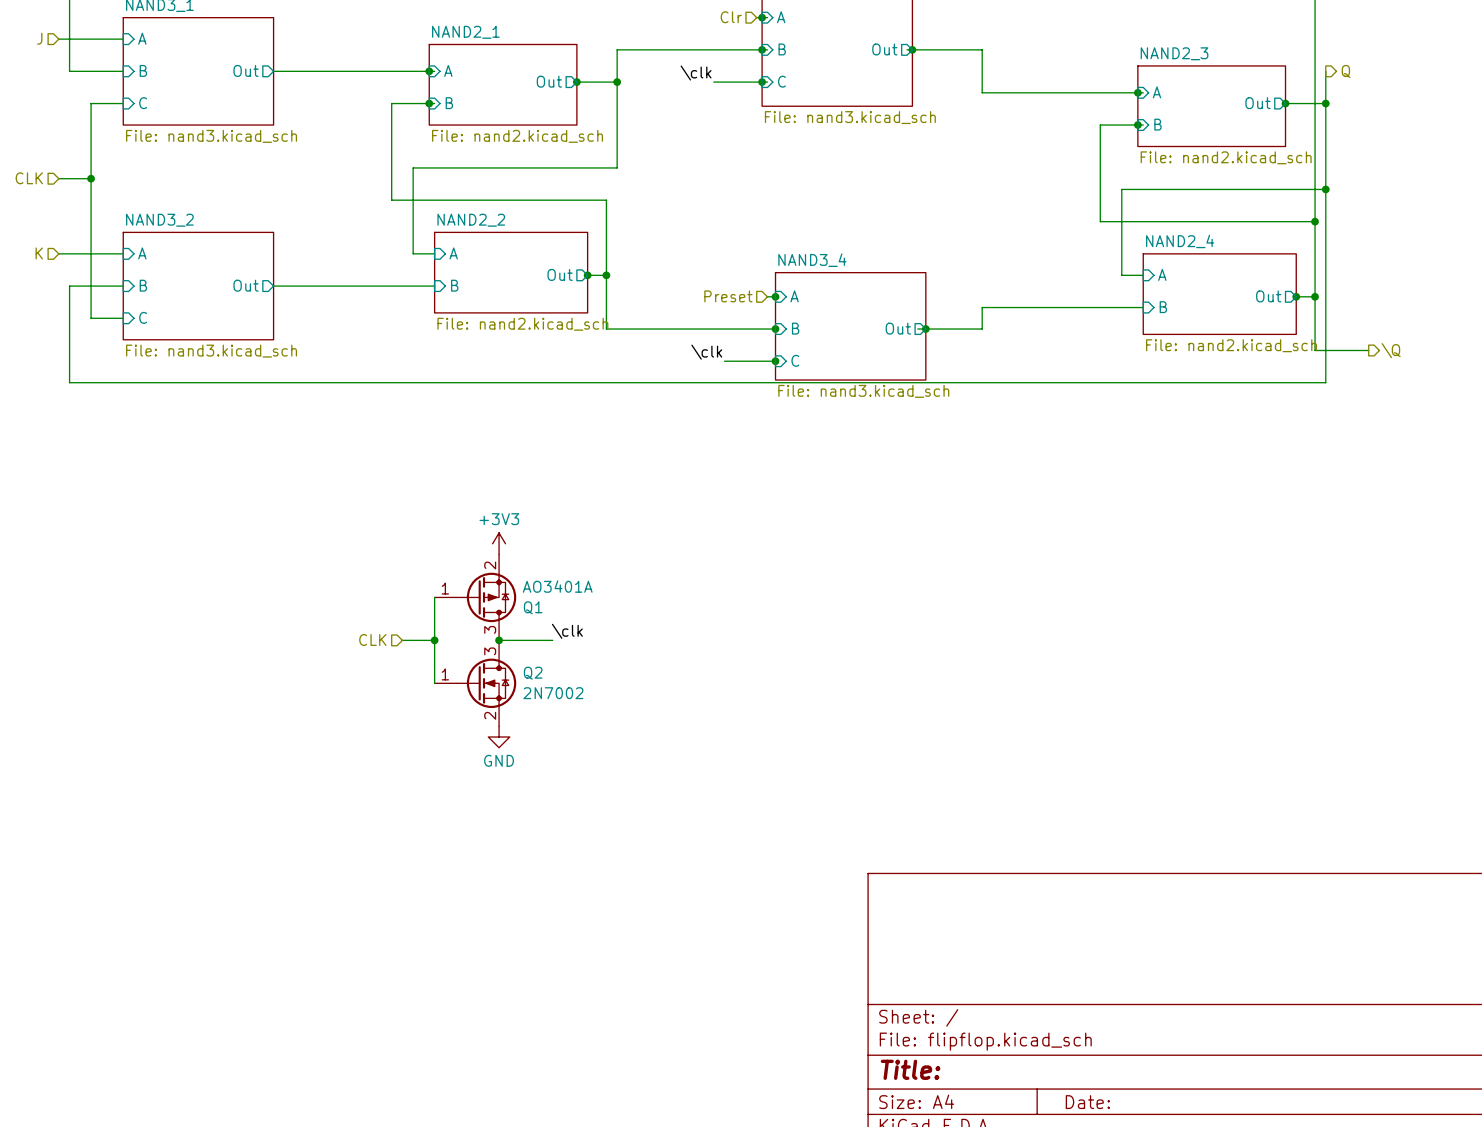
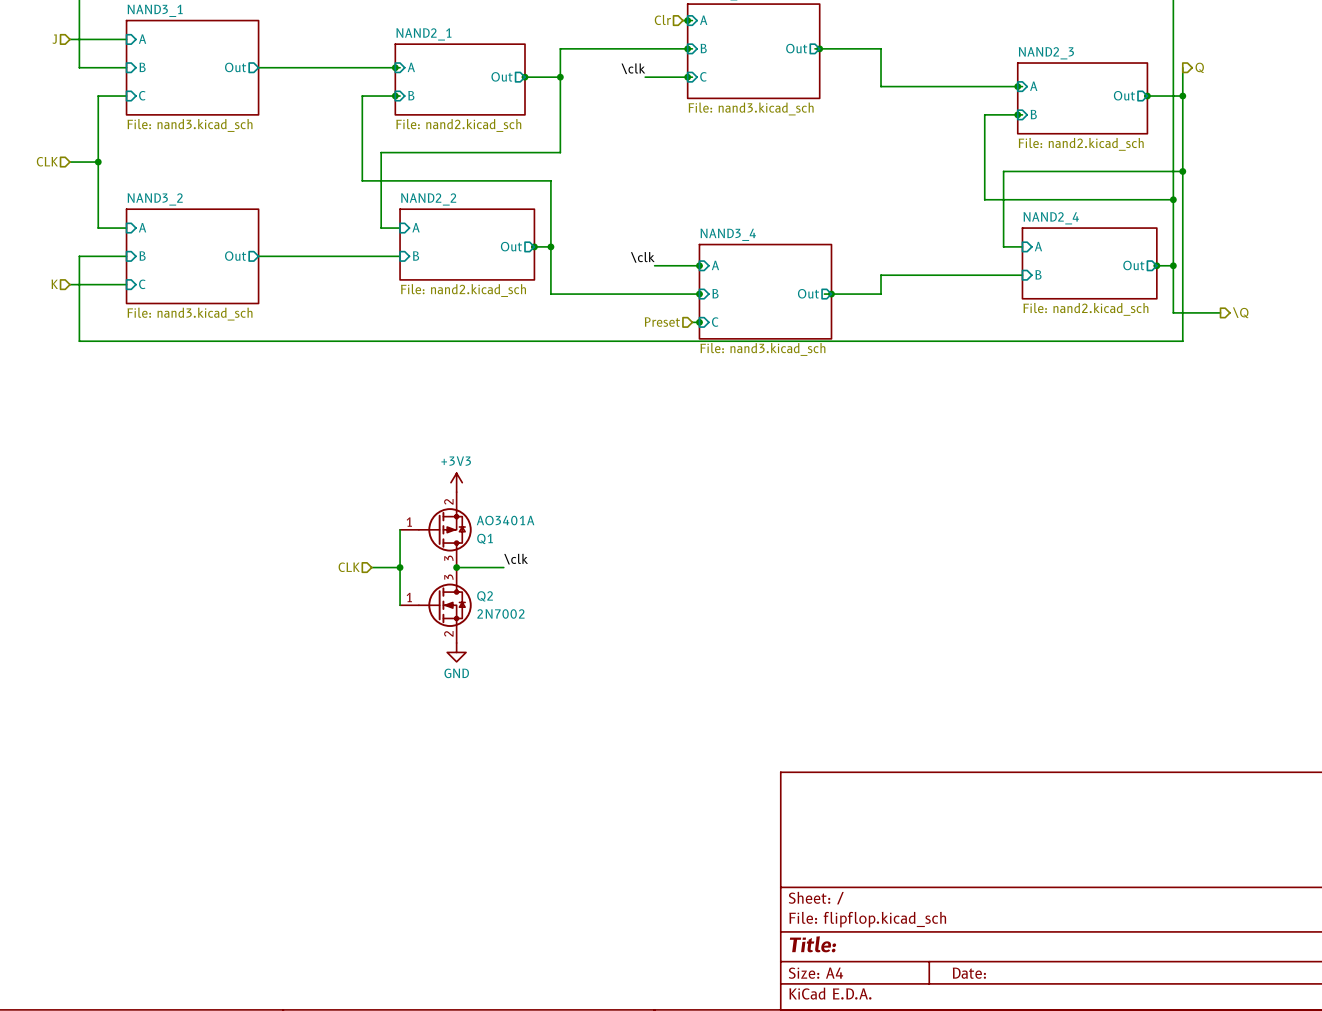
hierarchical label position: K (39, 253) -> K (54, 284)
wire: (58, 253) (91, 253) (91, 318) -> (69, 284) (98, 284)
hierarchical label position: Preset (728, 296) -> Preset (662, 322)
label position: \clk (706, 352) -> \clk (642, 257)
wire: (724, 361) (767, 361) -> (654, 265) (692, 265)

